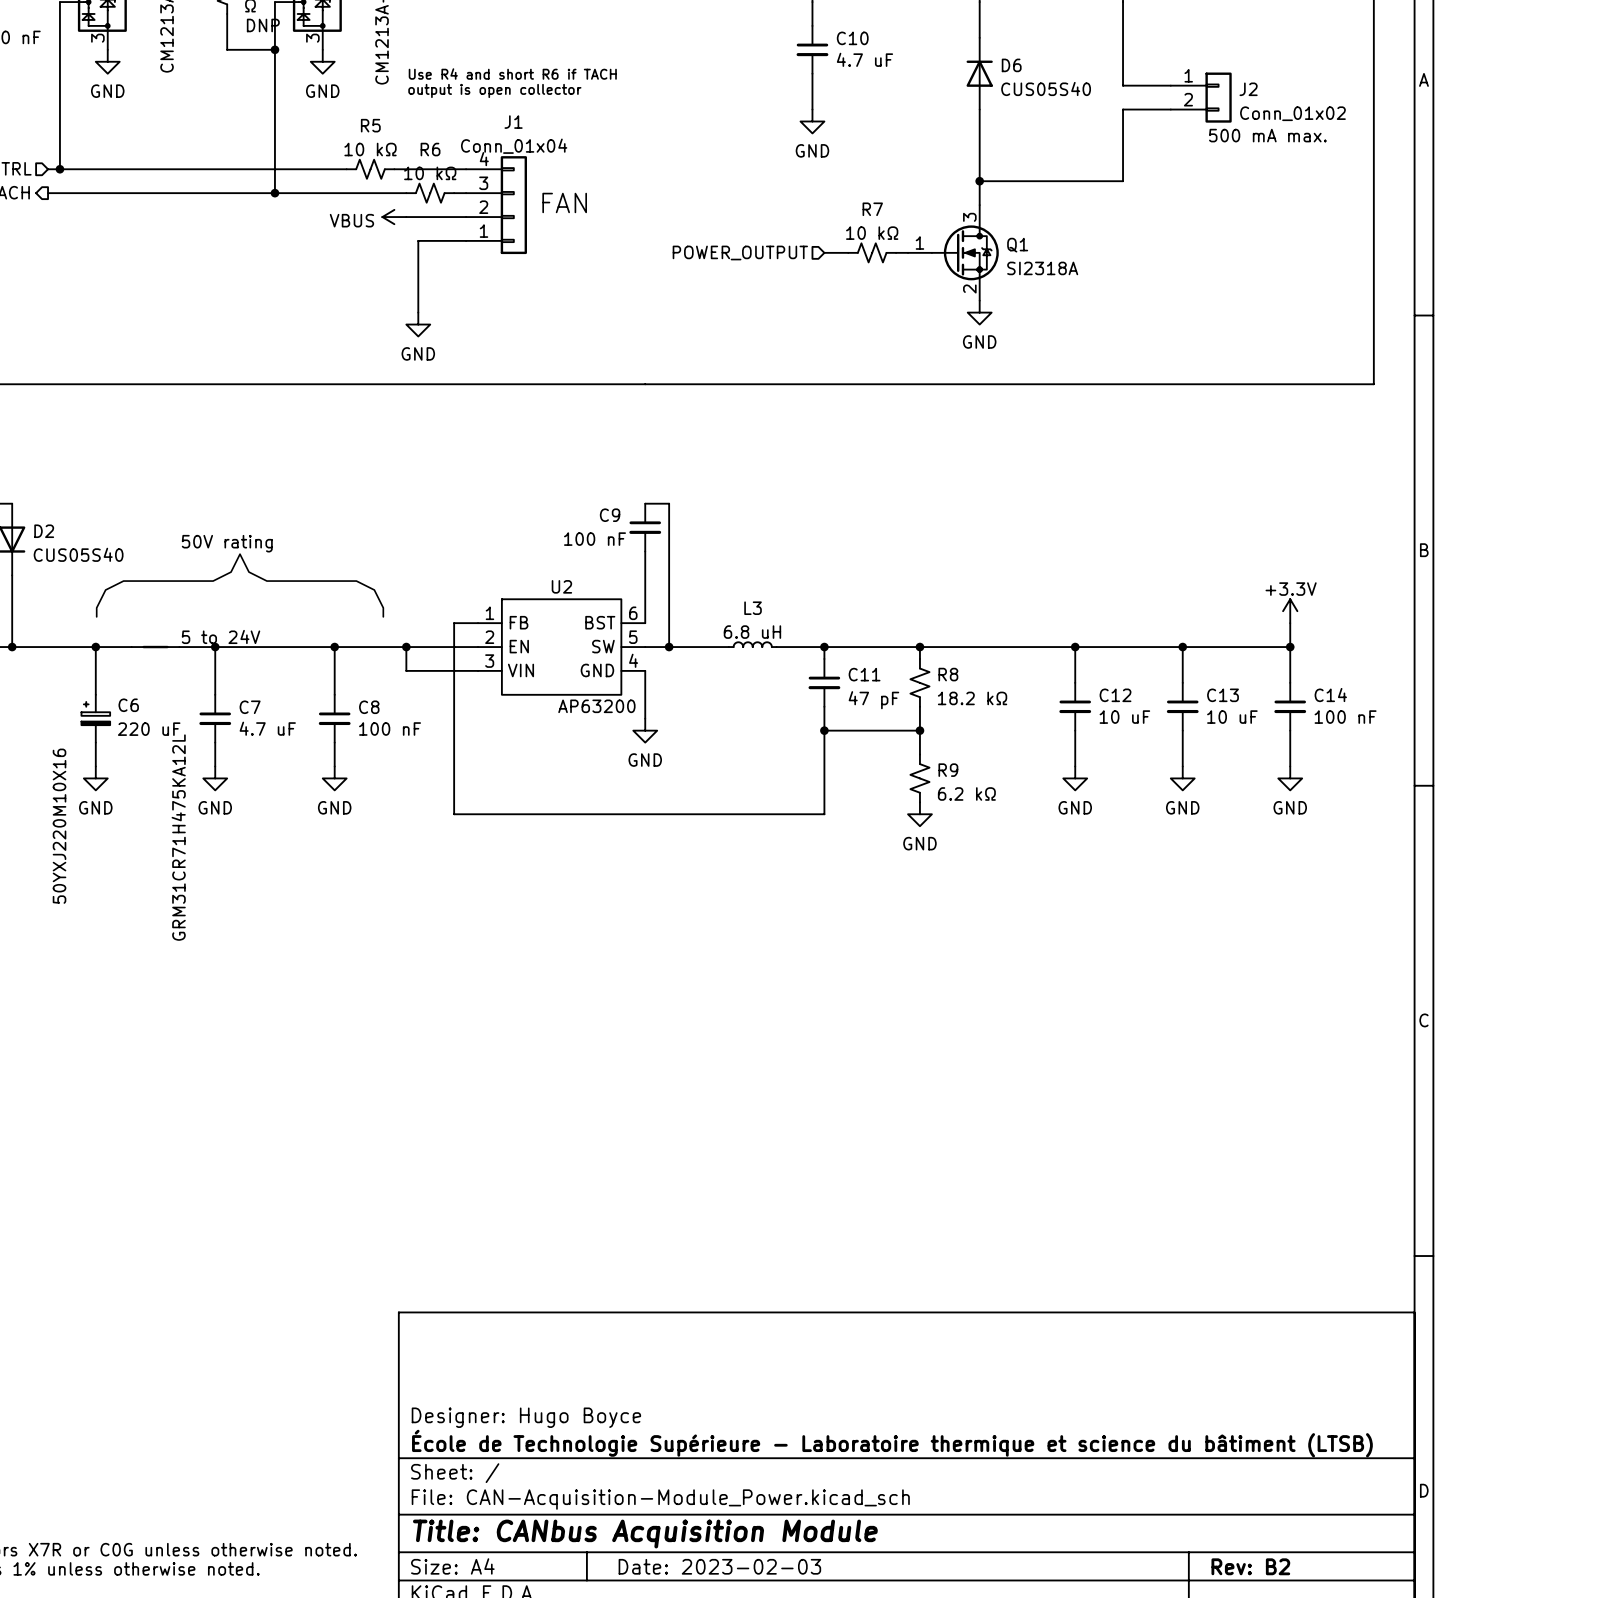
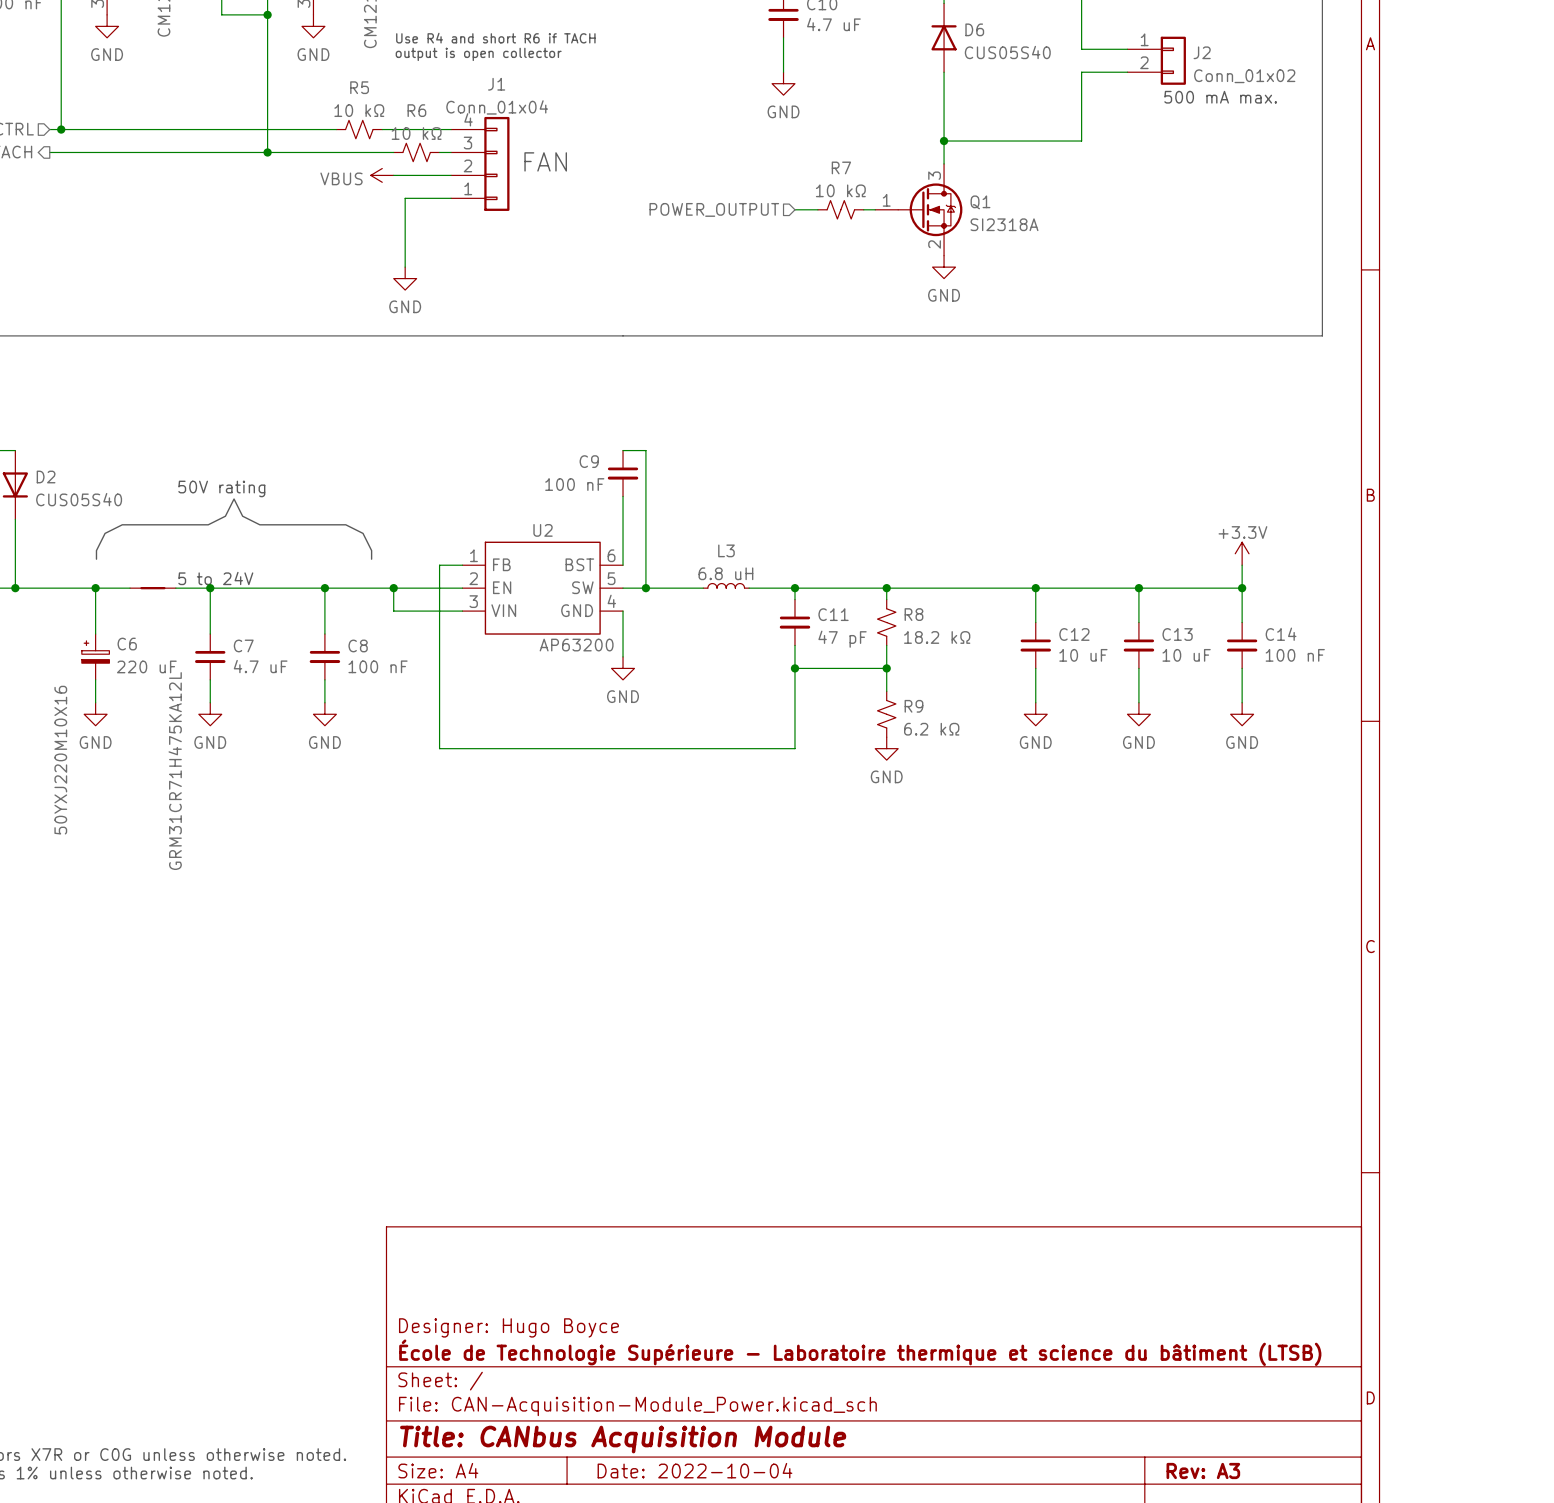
title block: Date: 2023-02-03 (719, 1566) -> Date: 2022-10-04 (694, 1470)
title block: Rev: B2 (1250, 1566) -> Rev: A3 (1203, 1471)

